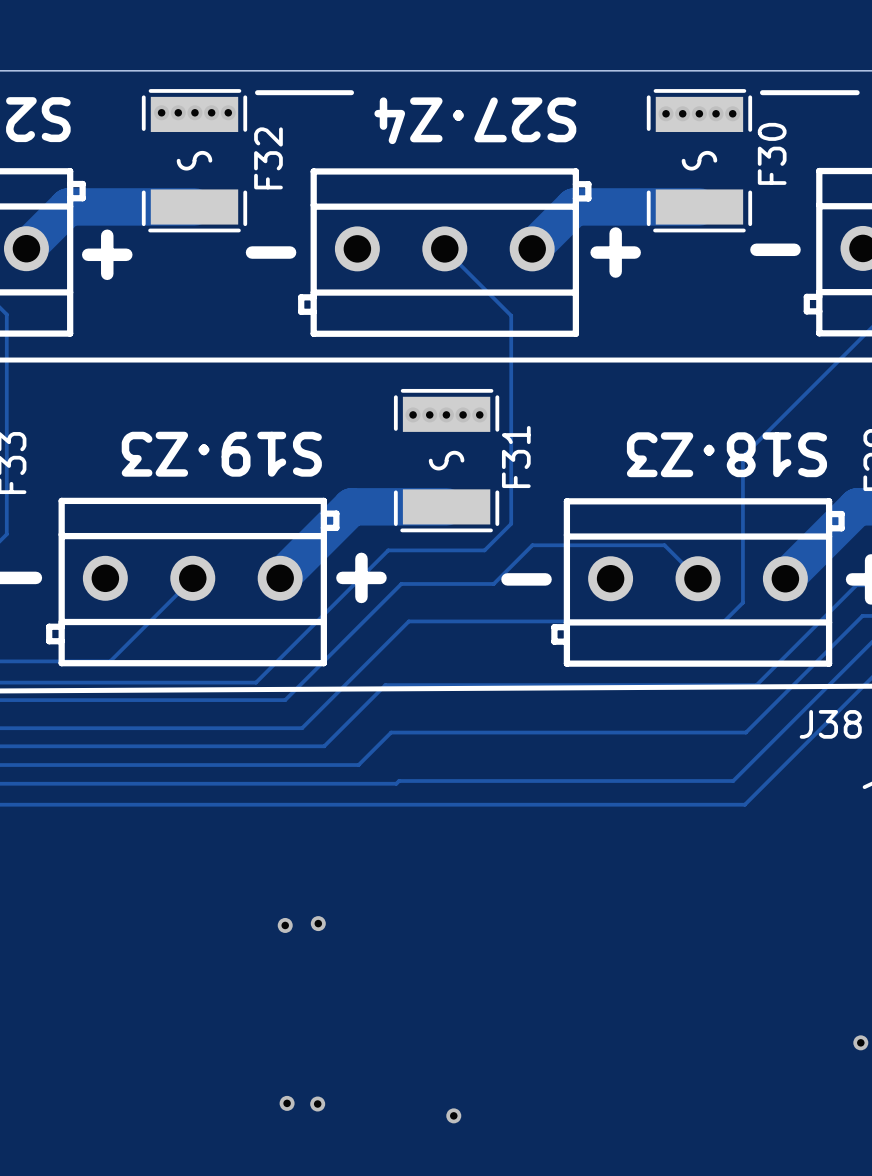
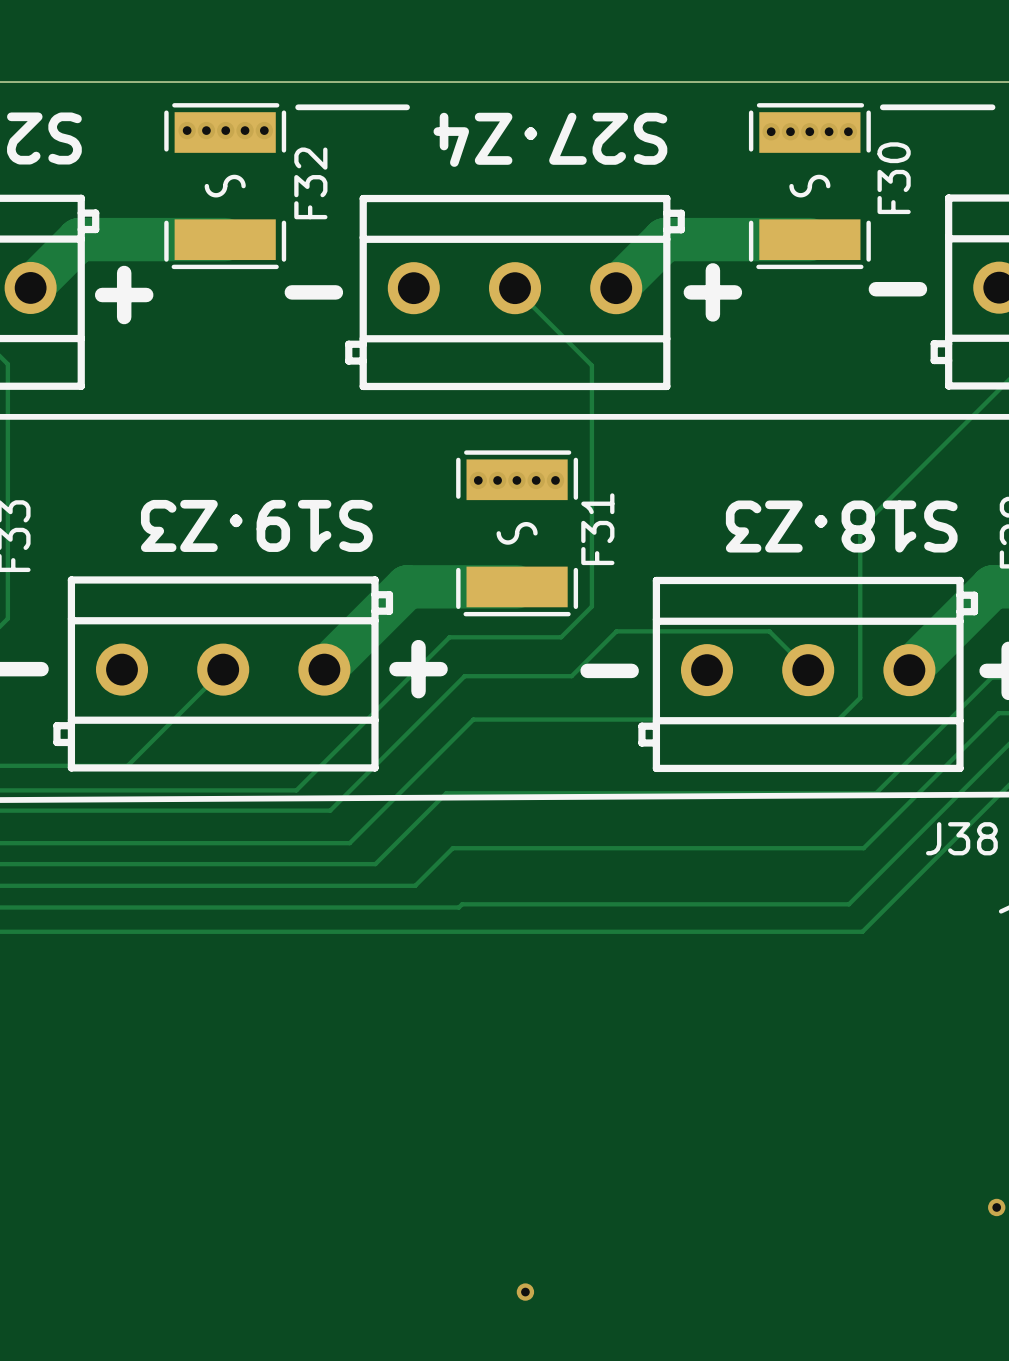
via: (318, 923) -> none
via: (285, 925) -> none
via: (287, 1103) -> none
via: (317, 1104) -> none

